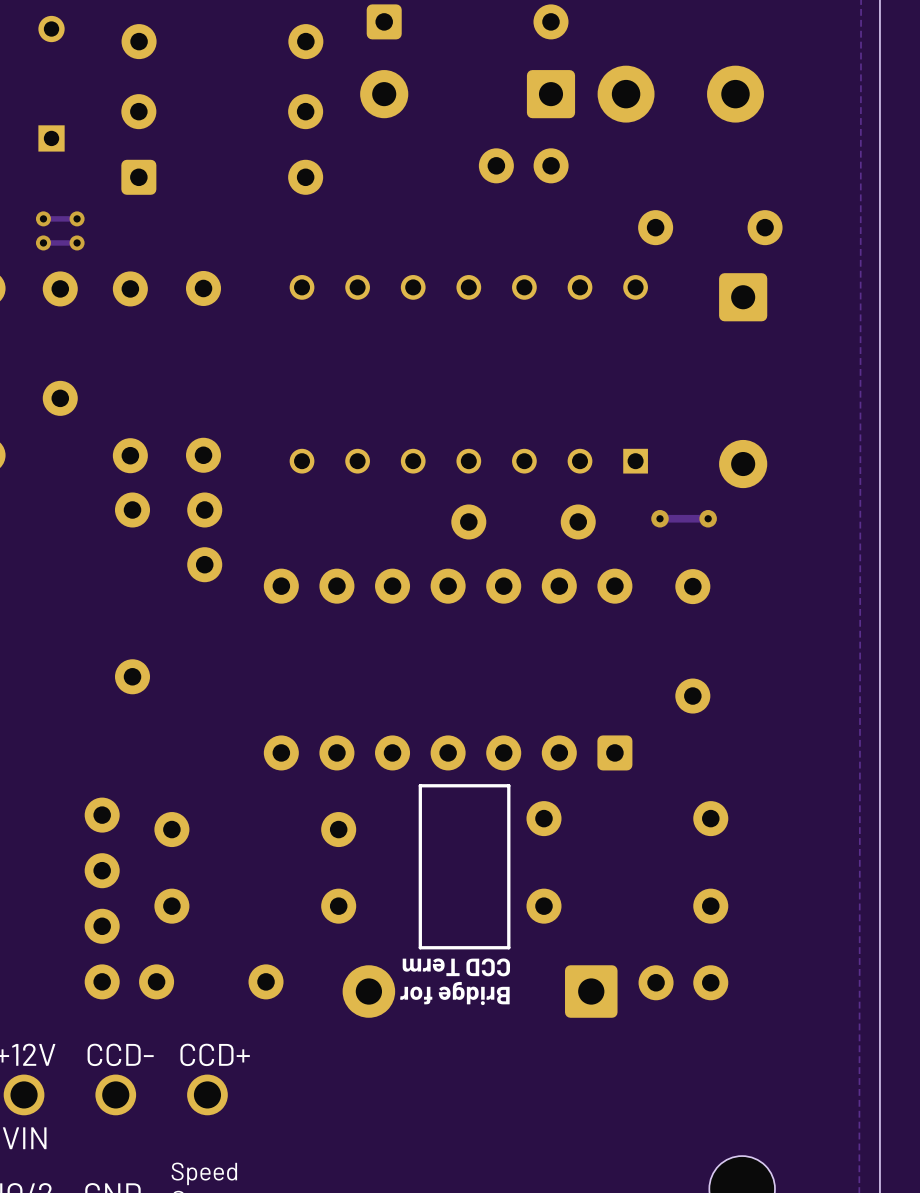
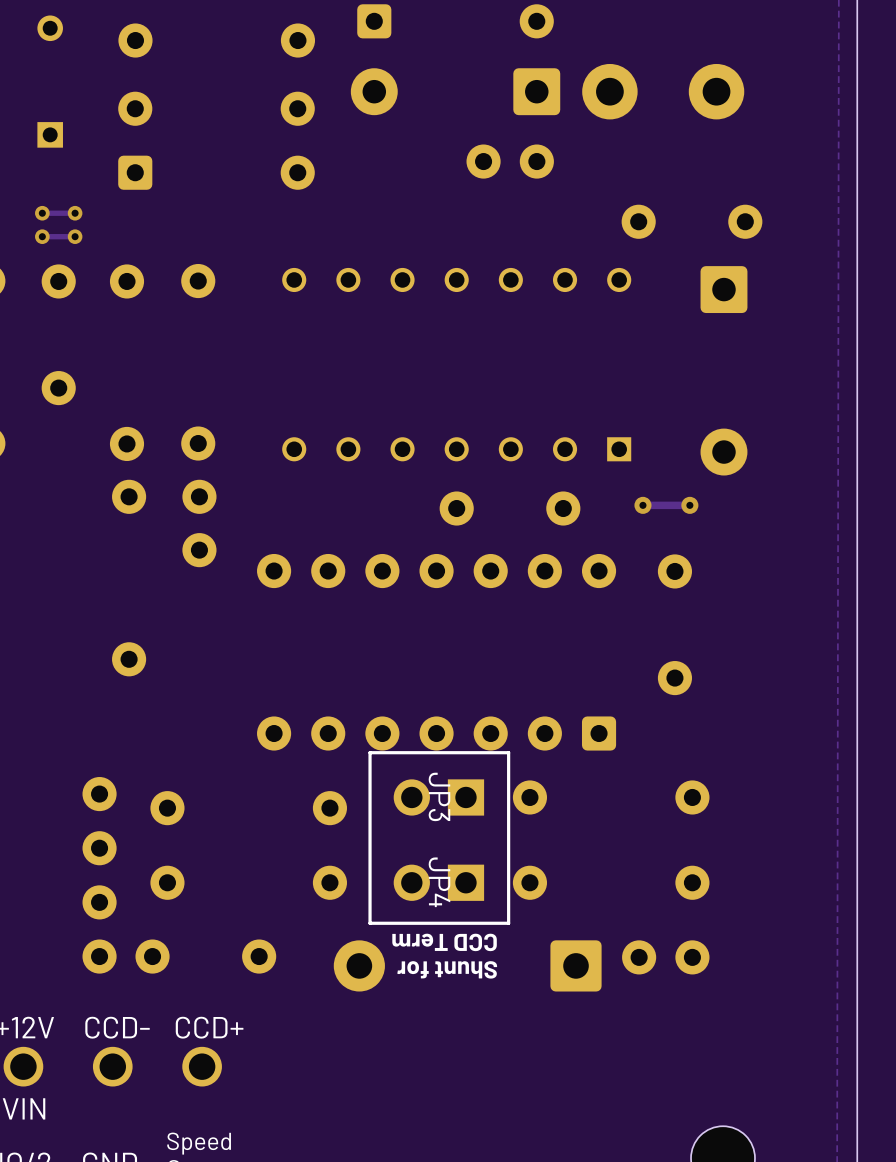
JP3: none -> (438, 797)
JP4: none -> (438, 882)
line: (508, 947) (508, 785) (420, 785) (420, 947) -> (495, 923) (508, 923) (508, 752) (370, 752) (370, 923) (409, 923)
text: Bridge for (454, 993) -> Shunt for (447, 969)

